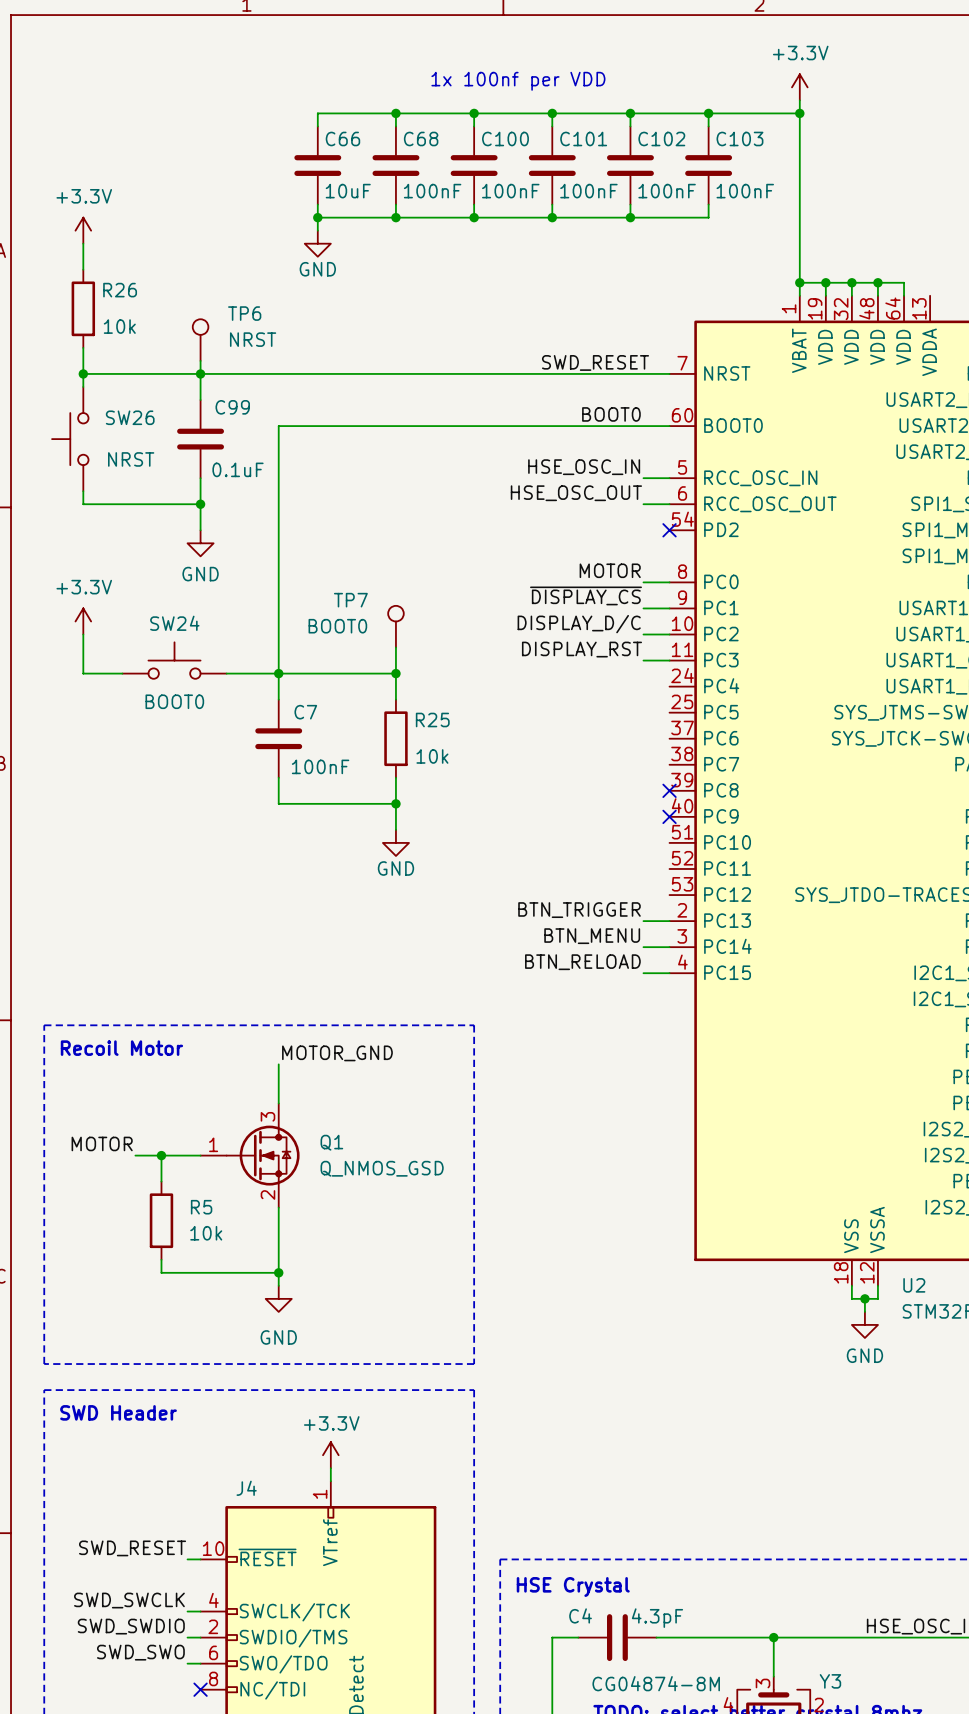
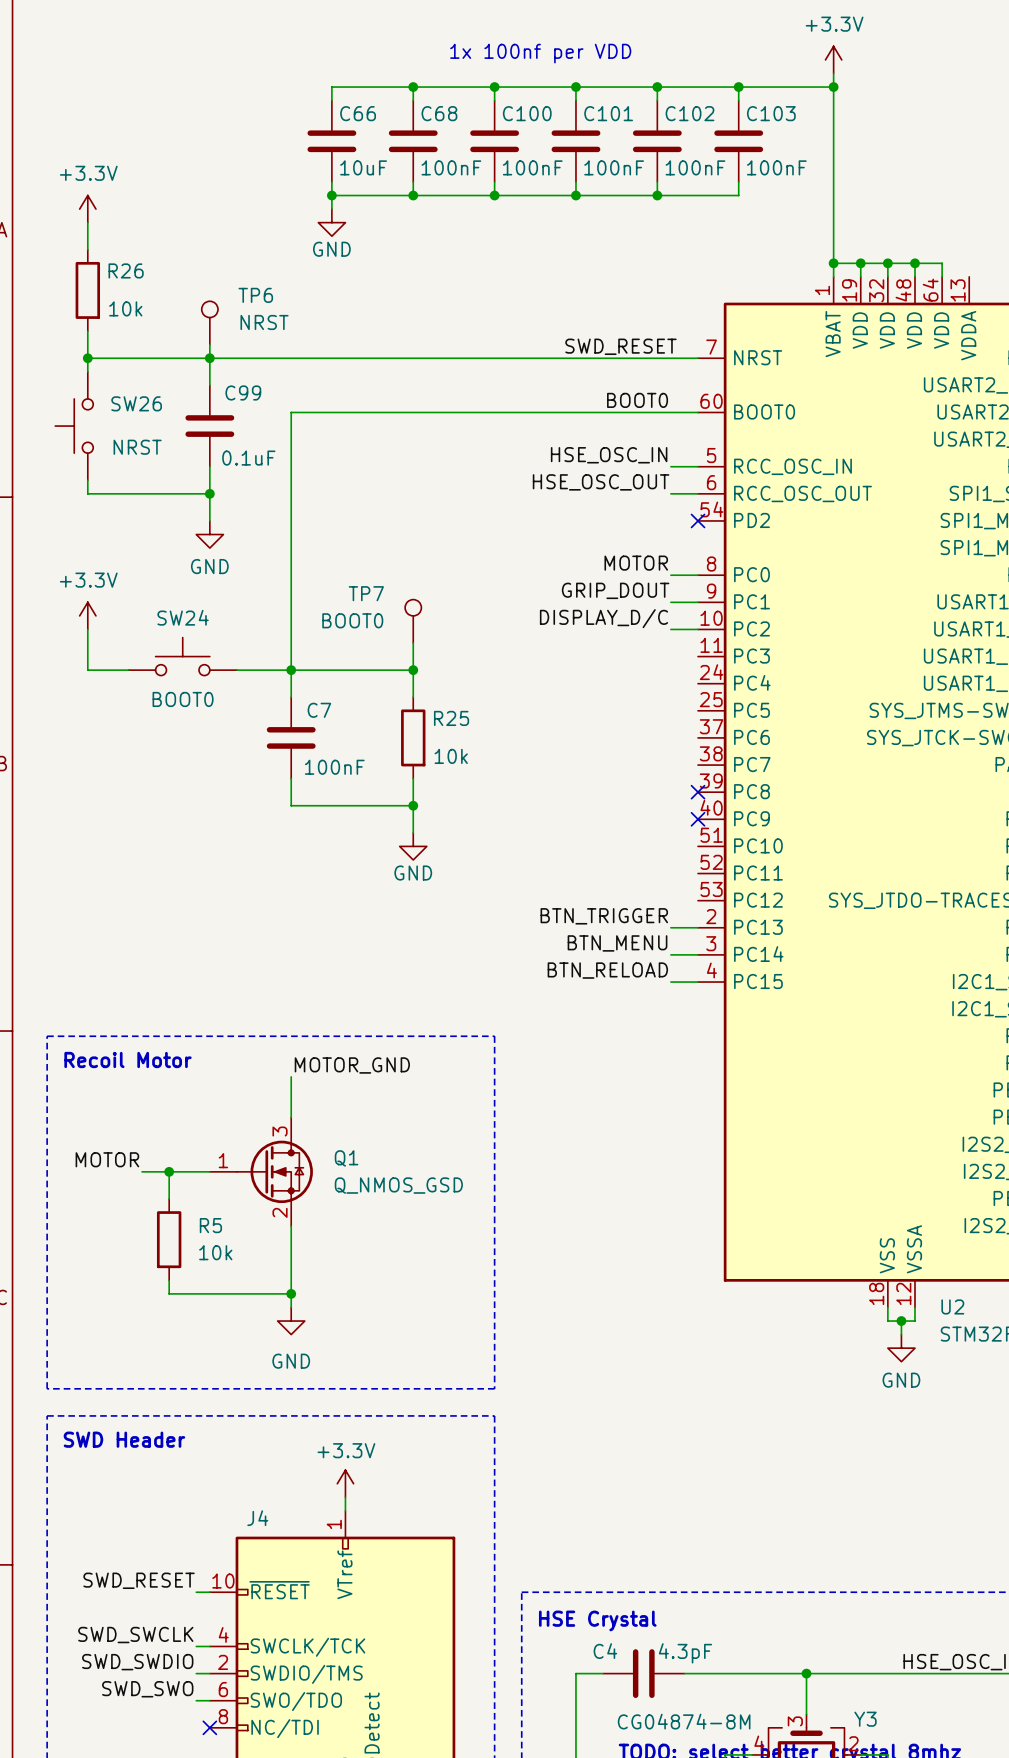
label: ~{DISPLAY_CS} (586, 595) -> GRIP_DOUT (615, 590)
label: DISPLAY_RST (581, 649) -> none
wire: (643, 660) (669, 660) -> none

